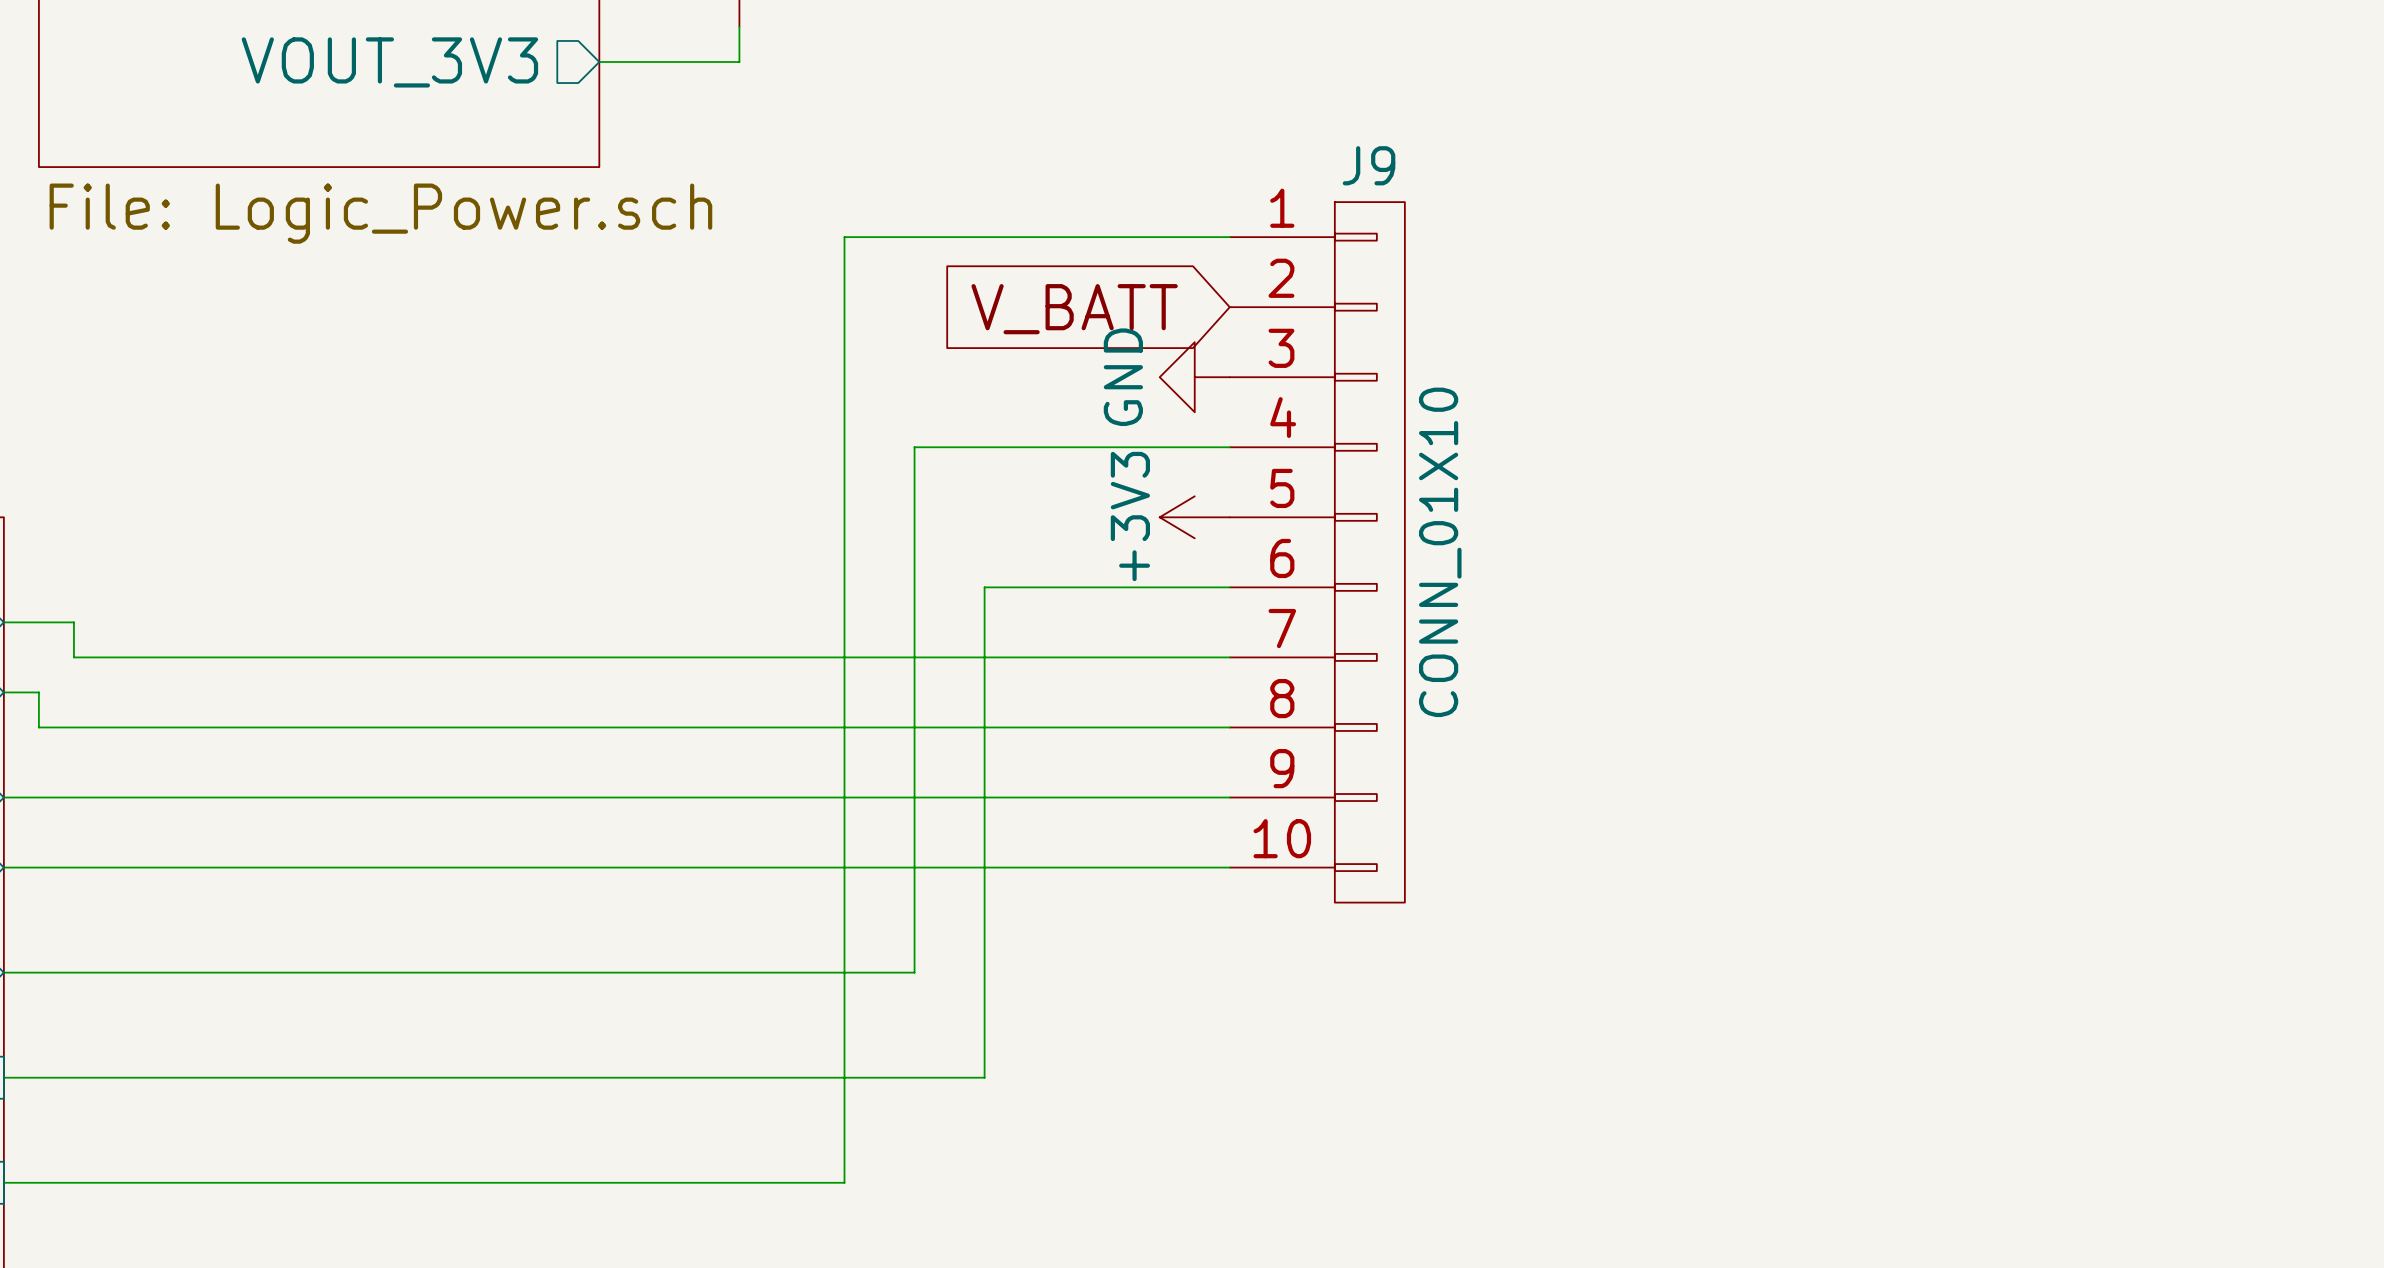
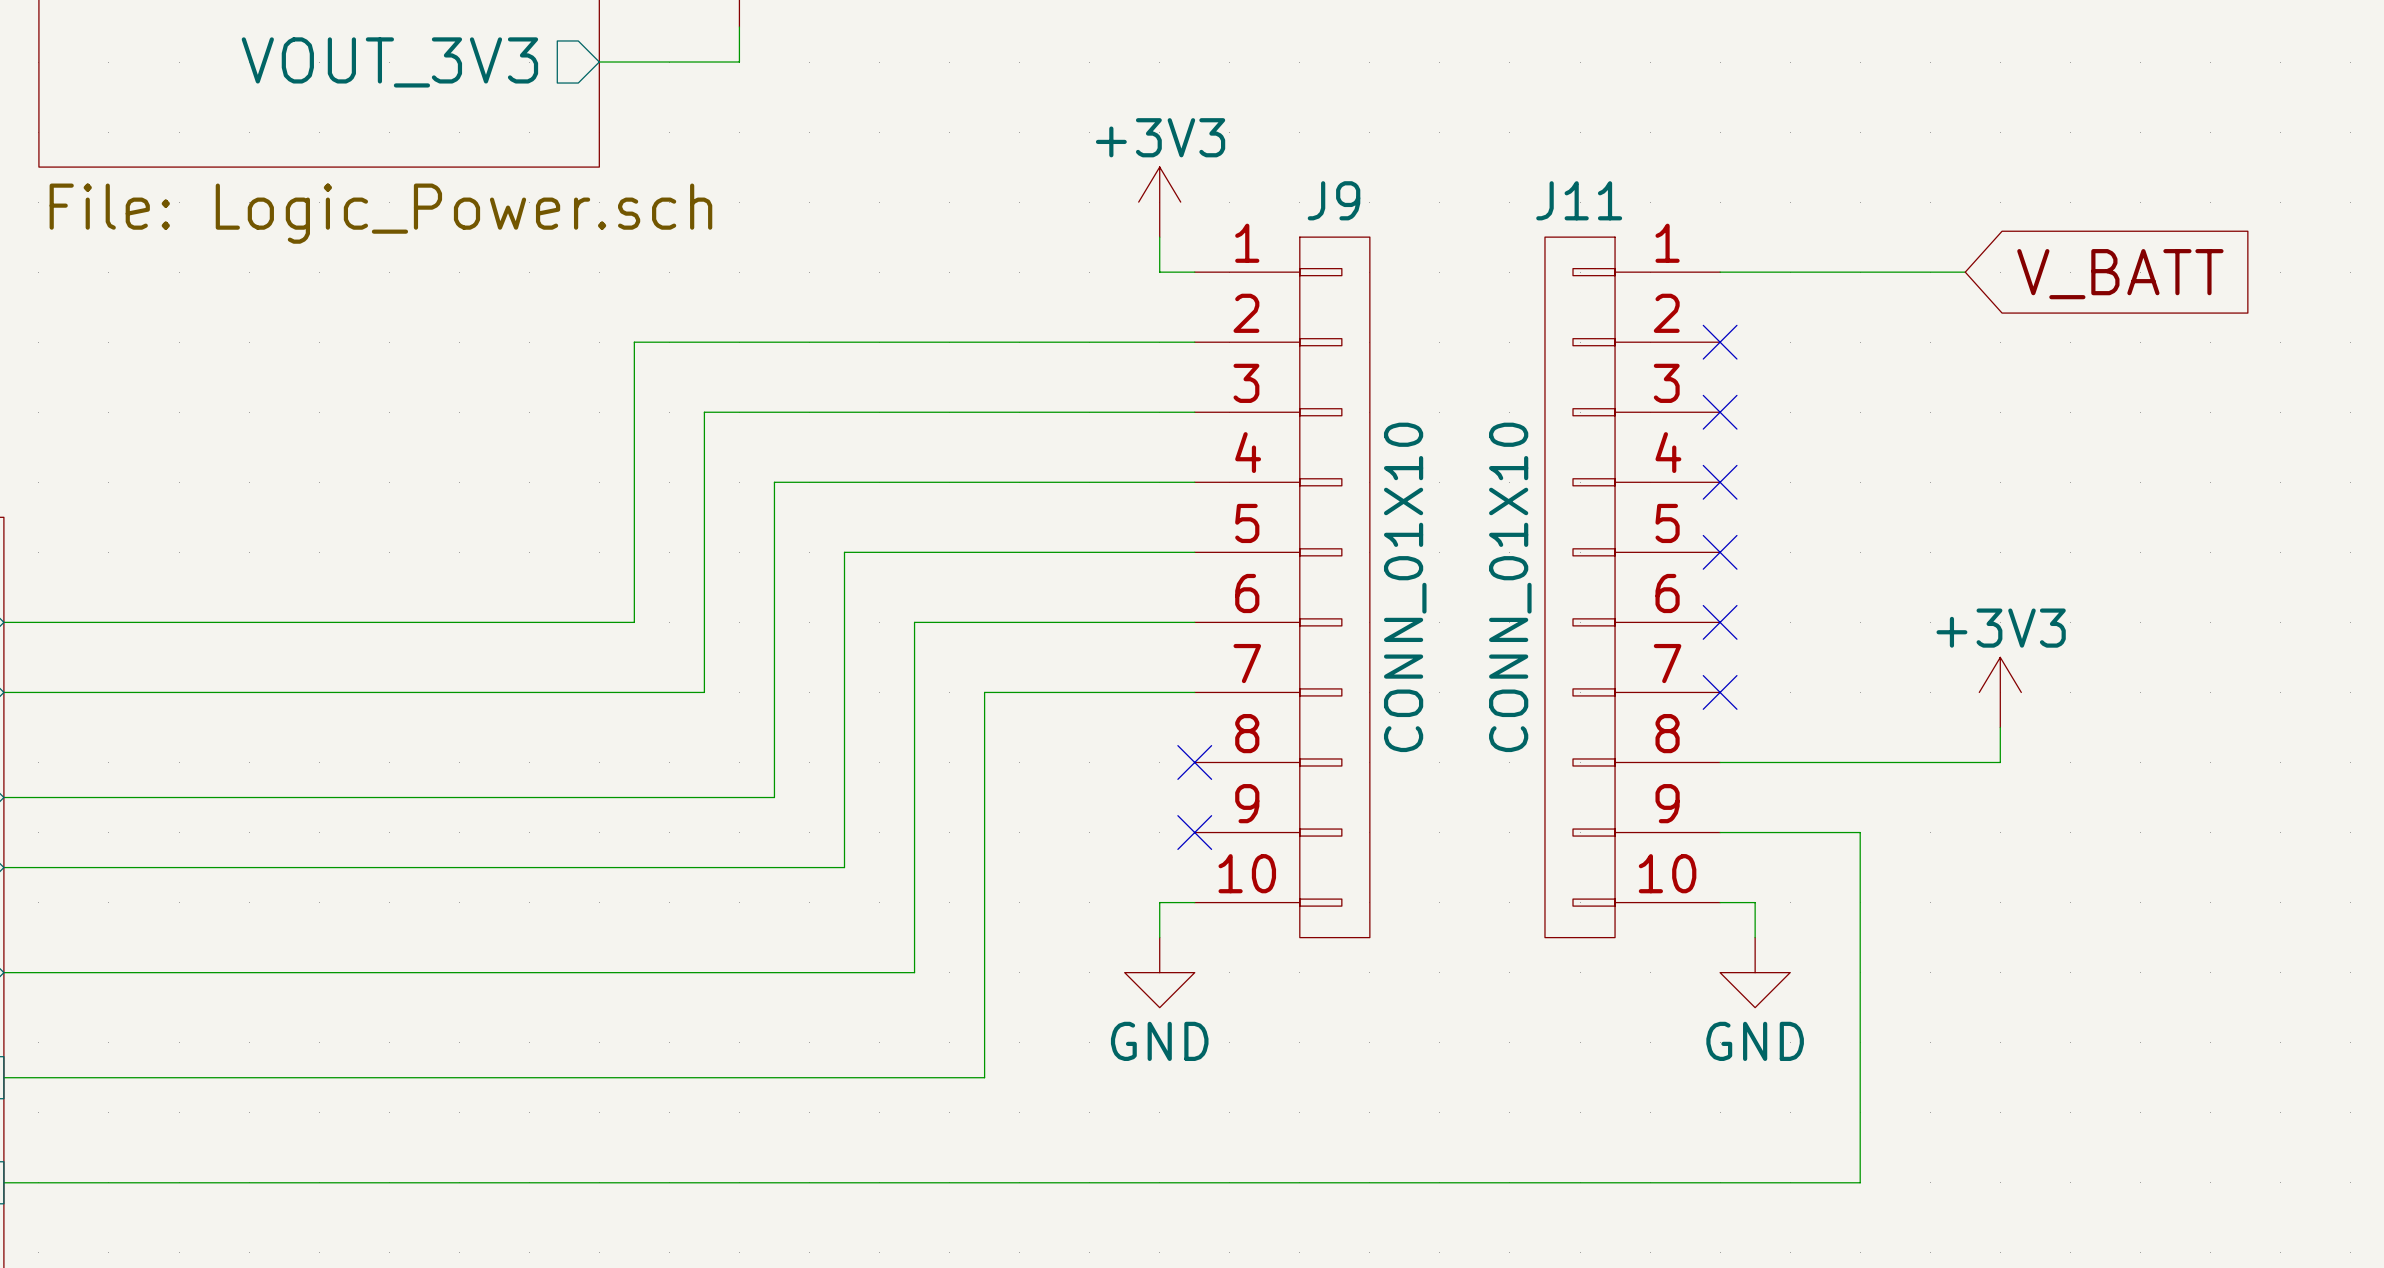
wire: none -> (1159, 237) (1159, 272) (1194, 272)
wire: (1229, 237) (844, 237) (844, 552) -> (1194, 552) (844, 552)
wire: none -> (1720, 272) (1965, 272)
global label: none -> V_BATT (2120, 274)
global label: V_BATT (1074, 309) -> none
no-connect mark: none -> (1720, 342)
power symbol: GND (1194, 377) -> none
no-connect mark: none -> (1720, 412)
wire: (1229, 447) (914, 447) (914, 622) -> (1194, 622) (914, 622)
no-connect mark: none -> (1720, 482)
power symbol rotation: 0° (1194, 517) -> 90° clockwise (1159, 202)
power symbol position: +3V3 (1194, 517) -> +3V3 (1159, 202)
J9 position: (1317, 552) -> (1282, 587)
no-connect mark: none -> (1720, 552)
wire: (1229, 587) (984, 587) (984, 692) -> (1194, 692) (984, 692)
J11: none -> CONN_01X10 (1632, 587)
wire: (73, 622) (73, 657) (1229, 657) -> (73, 622) (634, 622) (634, 342) (1194, 342)
no-connect mark: none -> (1720, 622)
wire: (38, 692) (38, 727) (1229, 727) -> (38, 692) (704, 692) (704, 412) (1194, 412)
no-connect mark: none -> (1720, 692)
power symbol: none -> +3V3 (2000, 692)
wire: none -> (2000, 727) (2000, 762) (1720, 762)
no-connect mark: none -> (1194, 762)
wire: (774, 797) (1229, 797) -> (774, 797) (774, 482) (1194, 482)
no-connect mark: none -> (1194, 832)
wire: (1229, 867) (844, 867) (844, 1182) -> (1720, 832) (1860, 832) (1860, 1182) (844, 1182)
wire: none -> (1194, 902) (1159, 902) (1159, 937)
wire: none -> (1720, 902) (1755, 902) (1755, 937)
power symbol: none -> GND (1159, 972)
power symbol: none -> GND (1755, 972)

